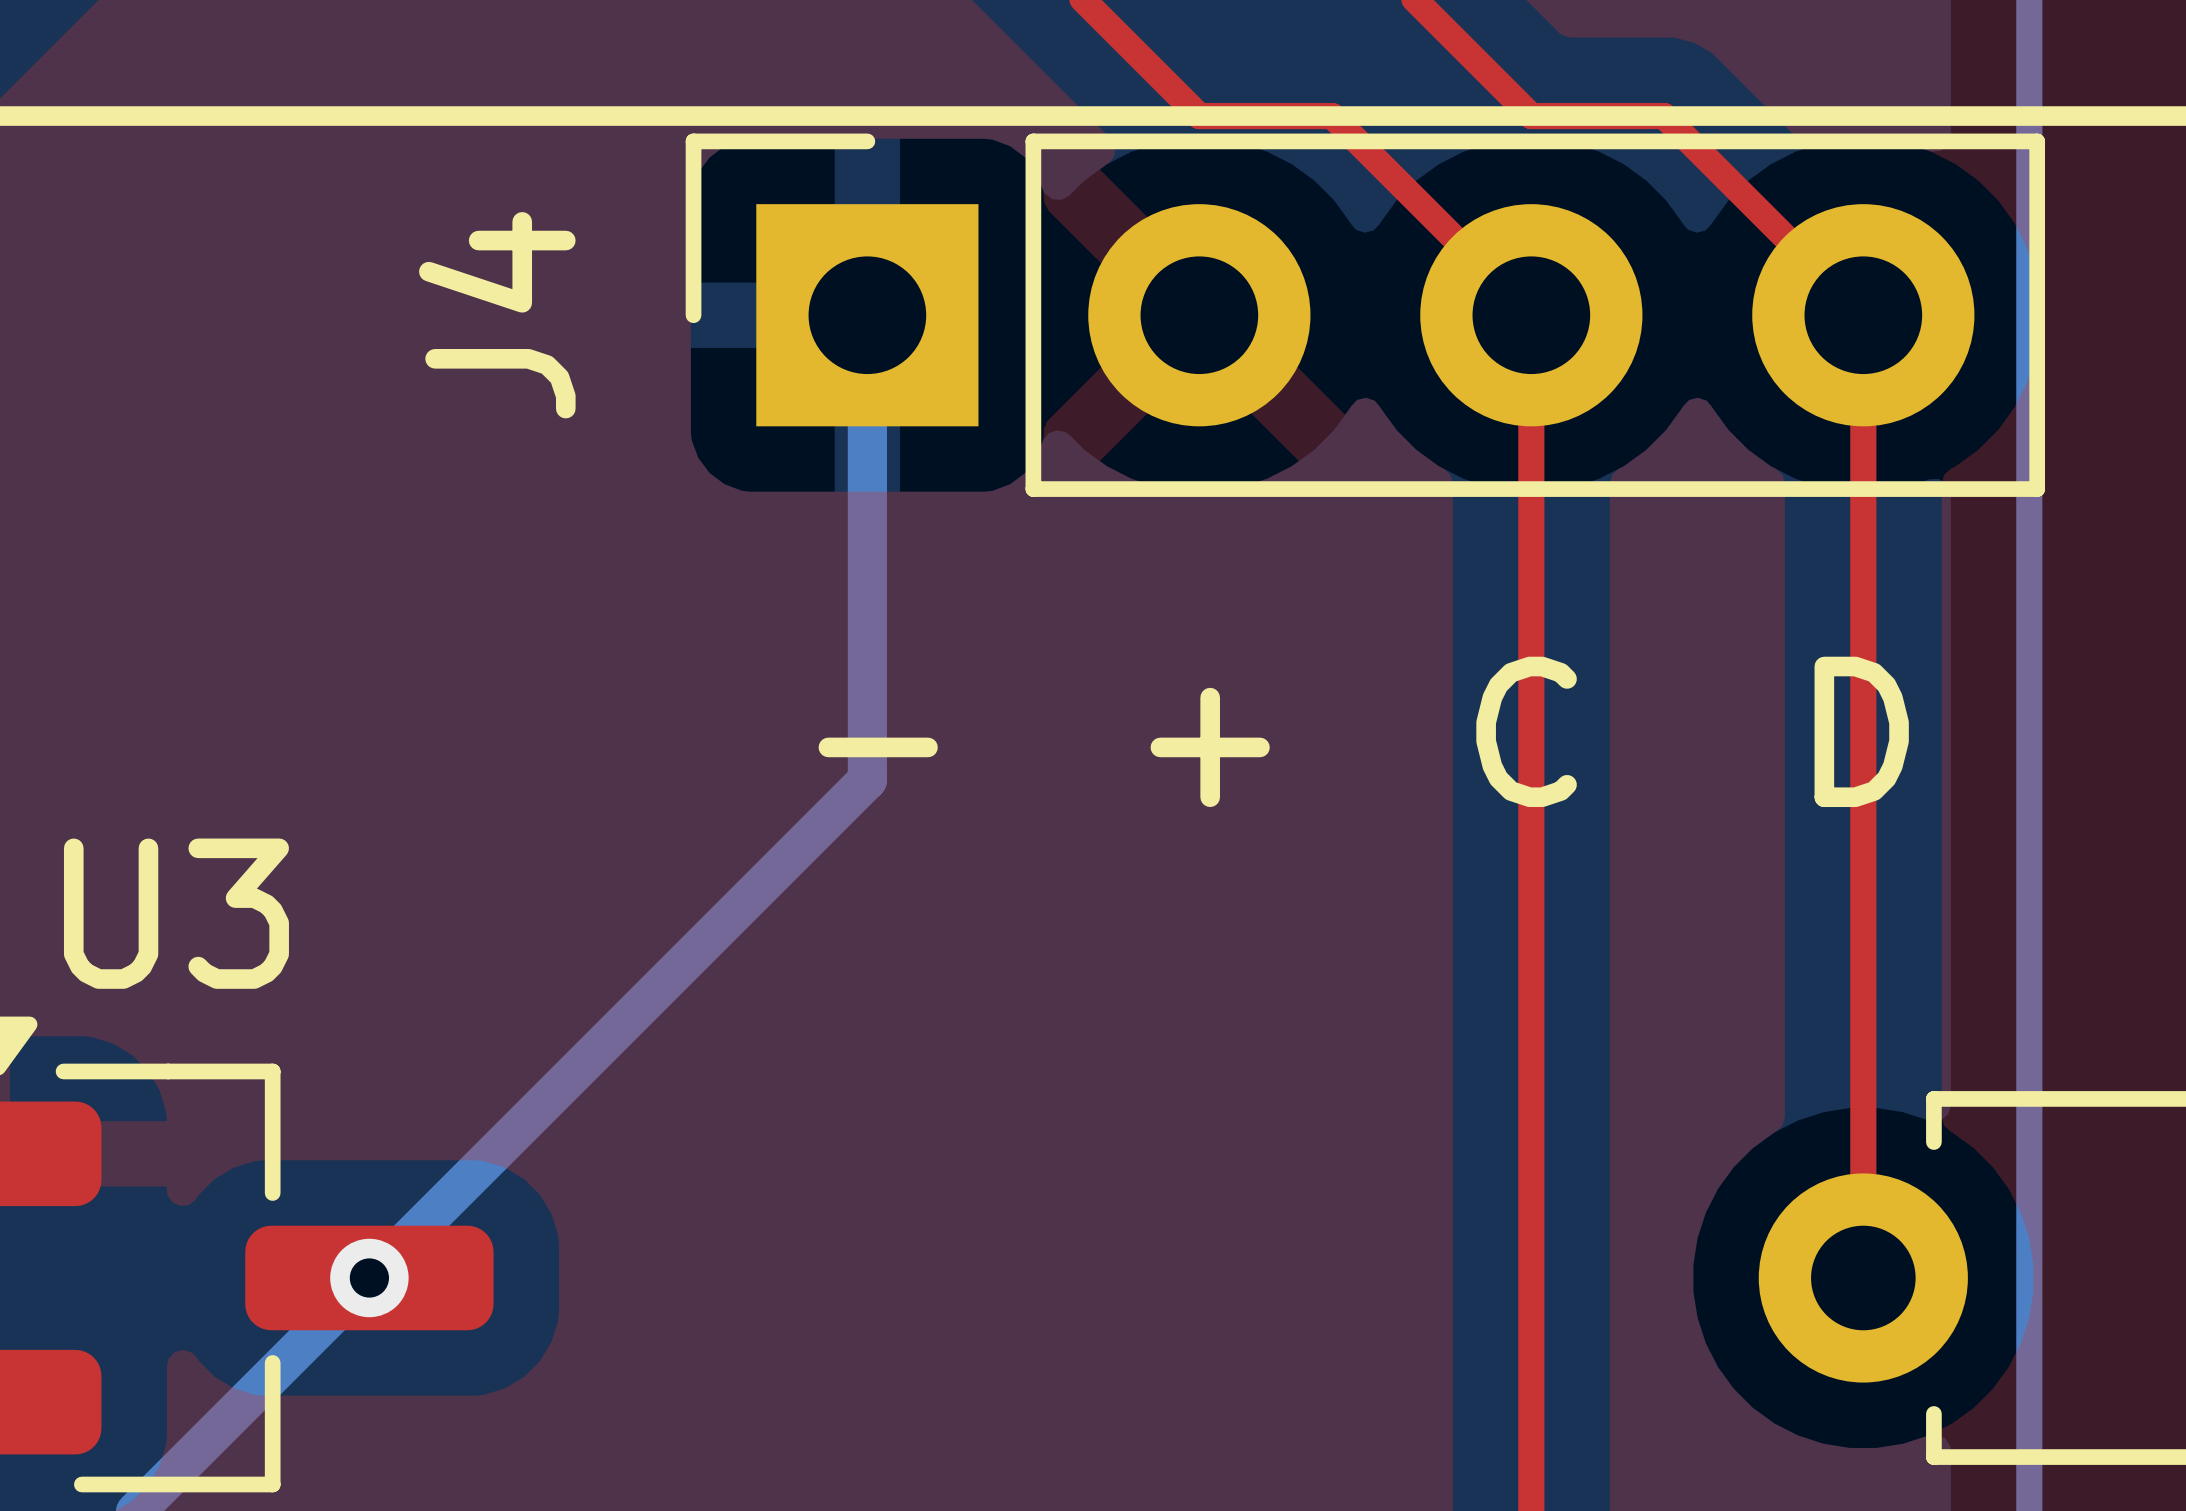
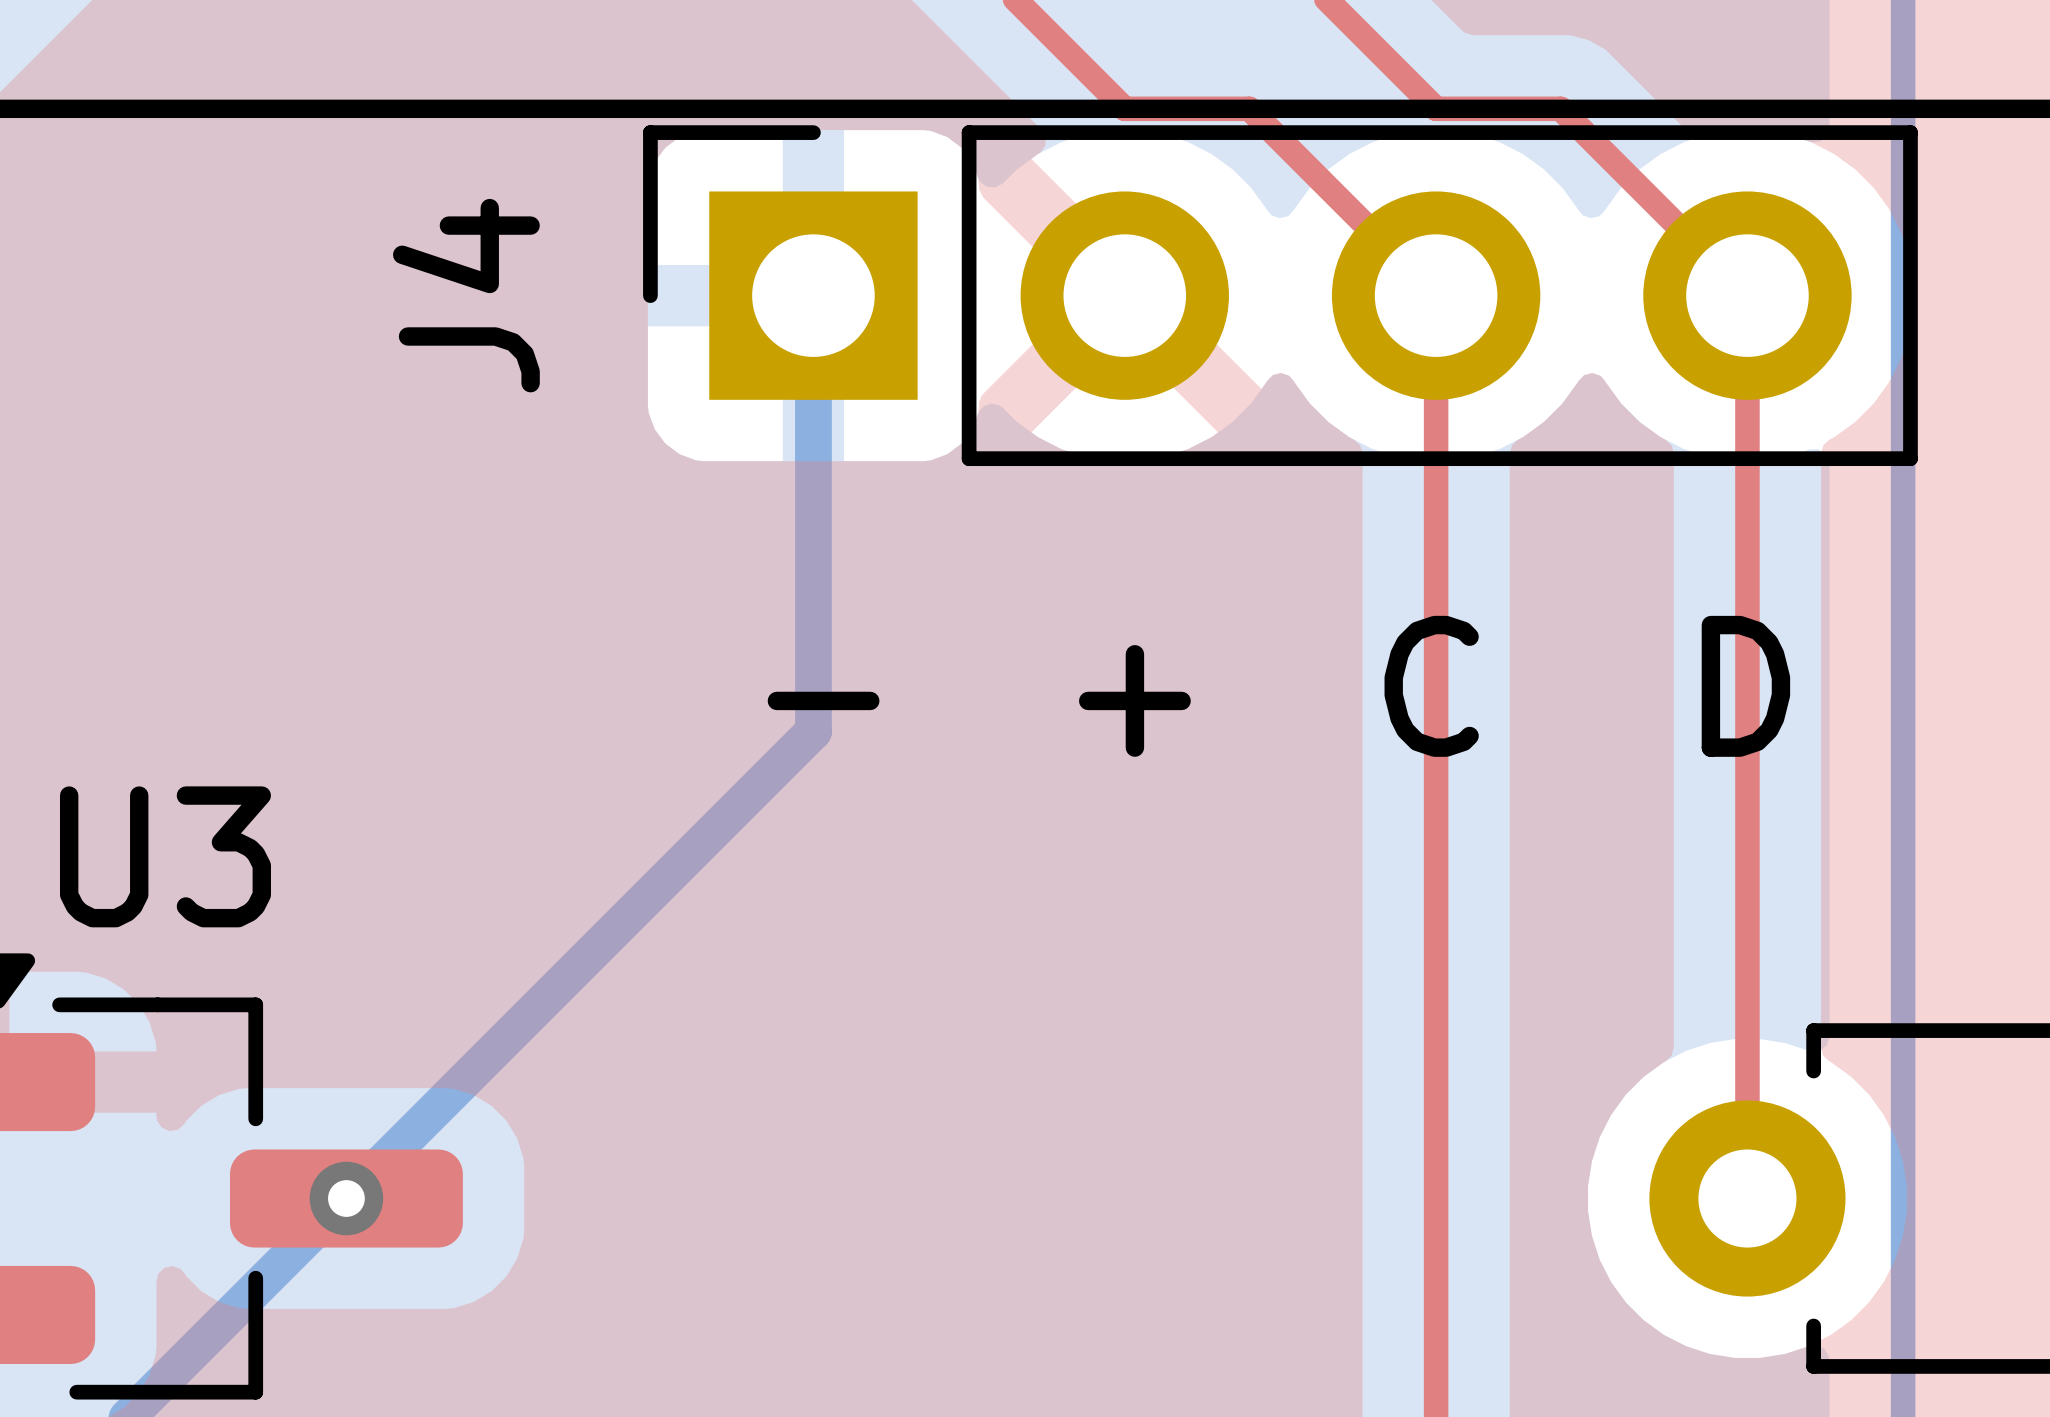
J4 footprint: [685, 133, 2046, 497] -> [643, 125, 1918, 467]

